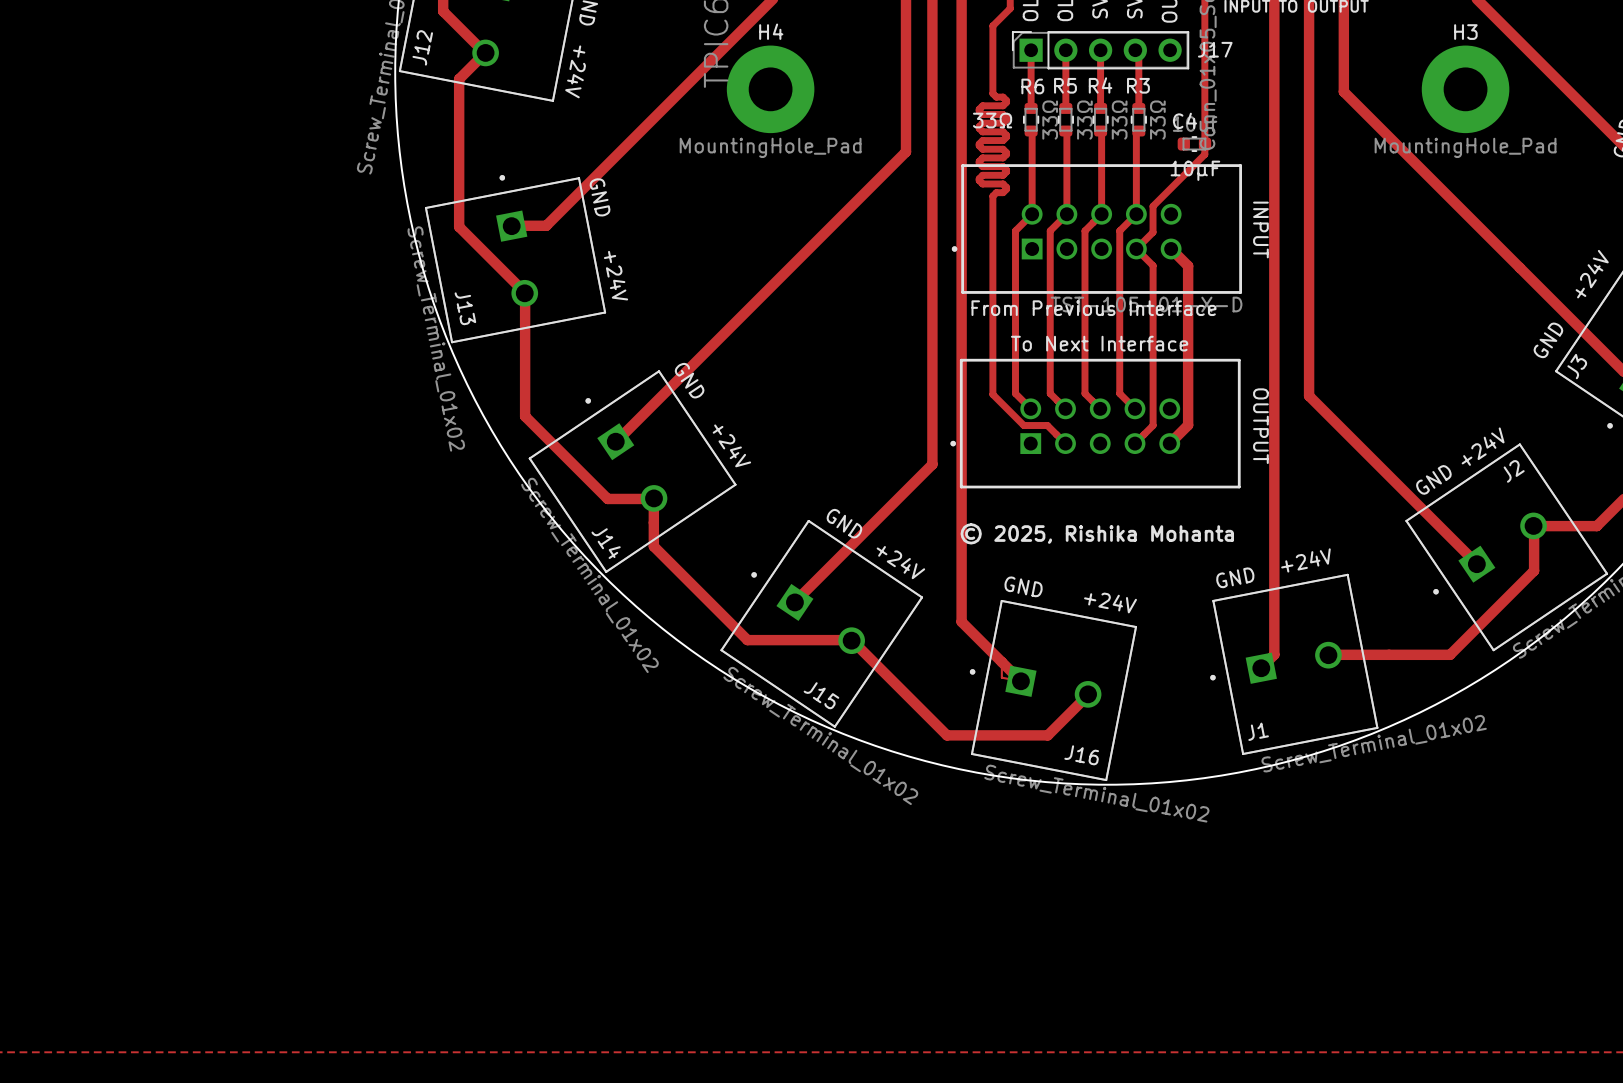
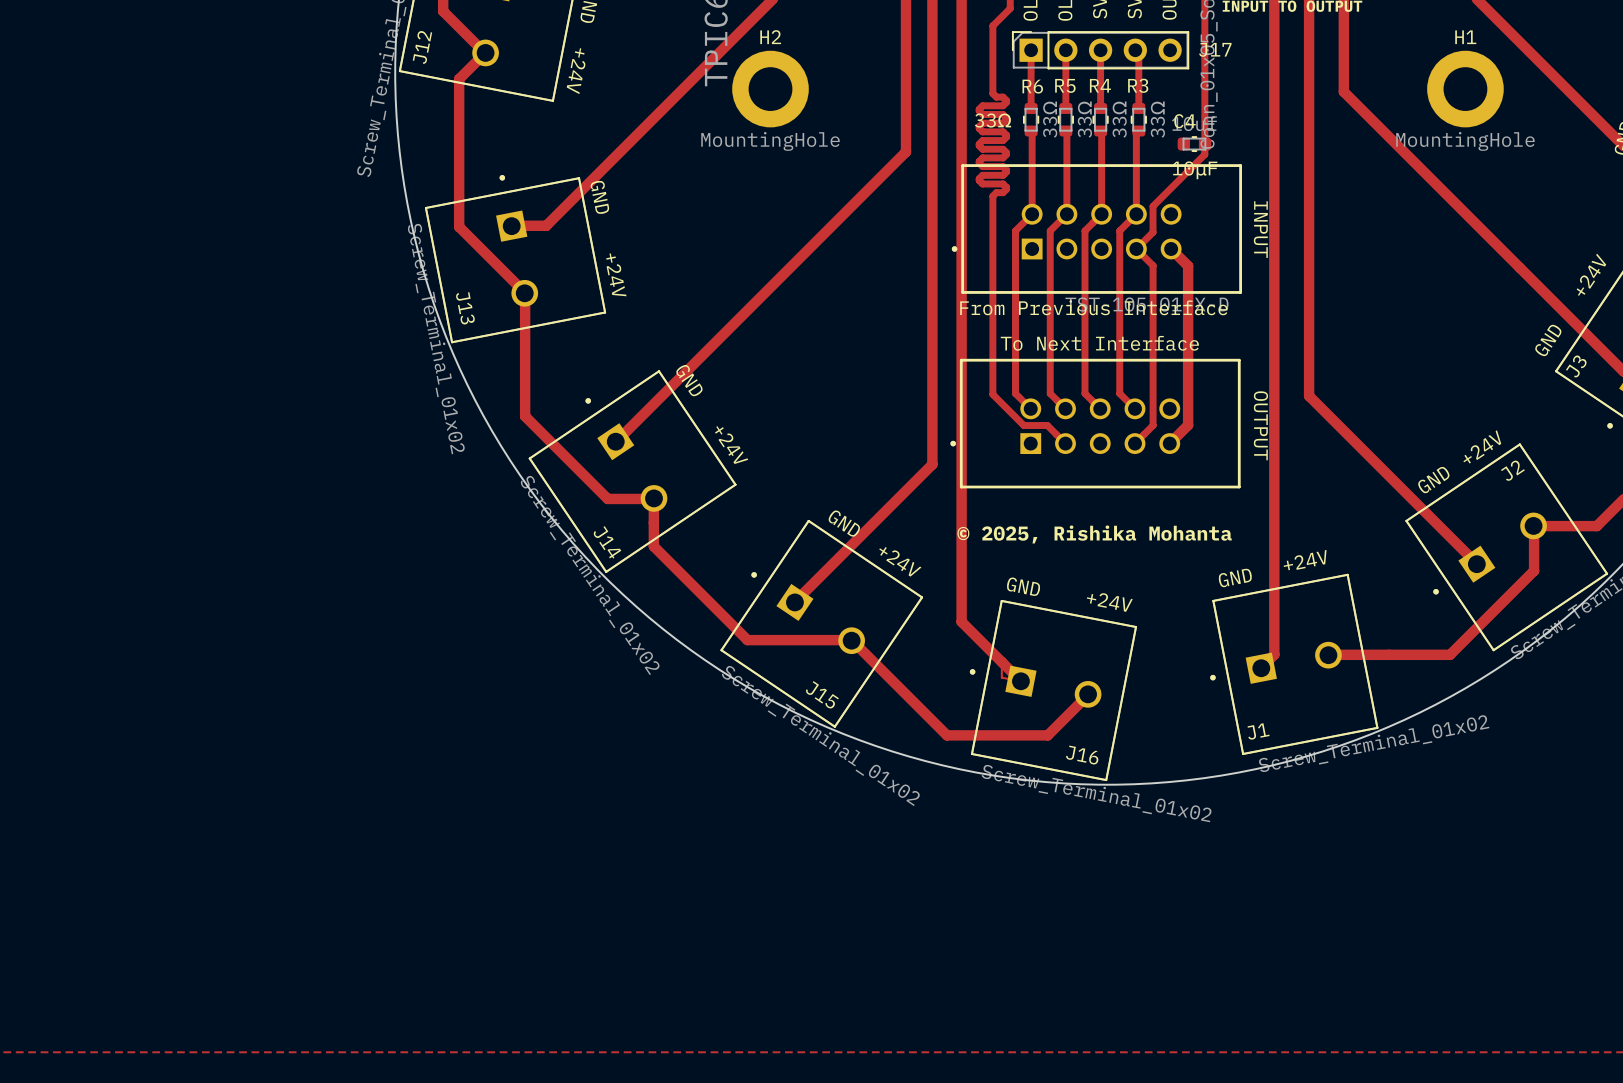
H4: MountingHole_Pad (770, 89) -> none
H2: none -> MountingHole (770, 89)
H3: MountingHole_Pad (1465, 89) -> none
H1: none -> MountingHole (1465, 89)

